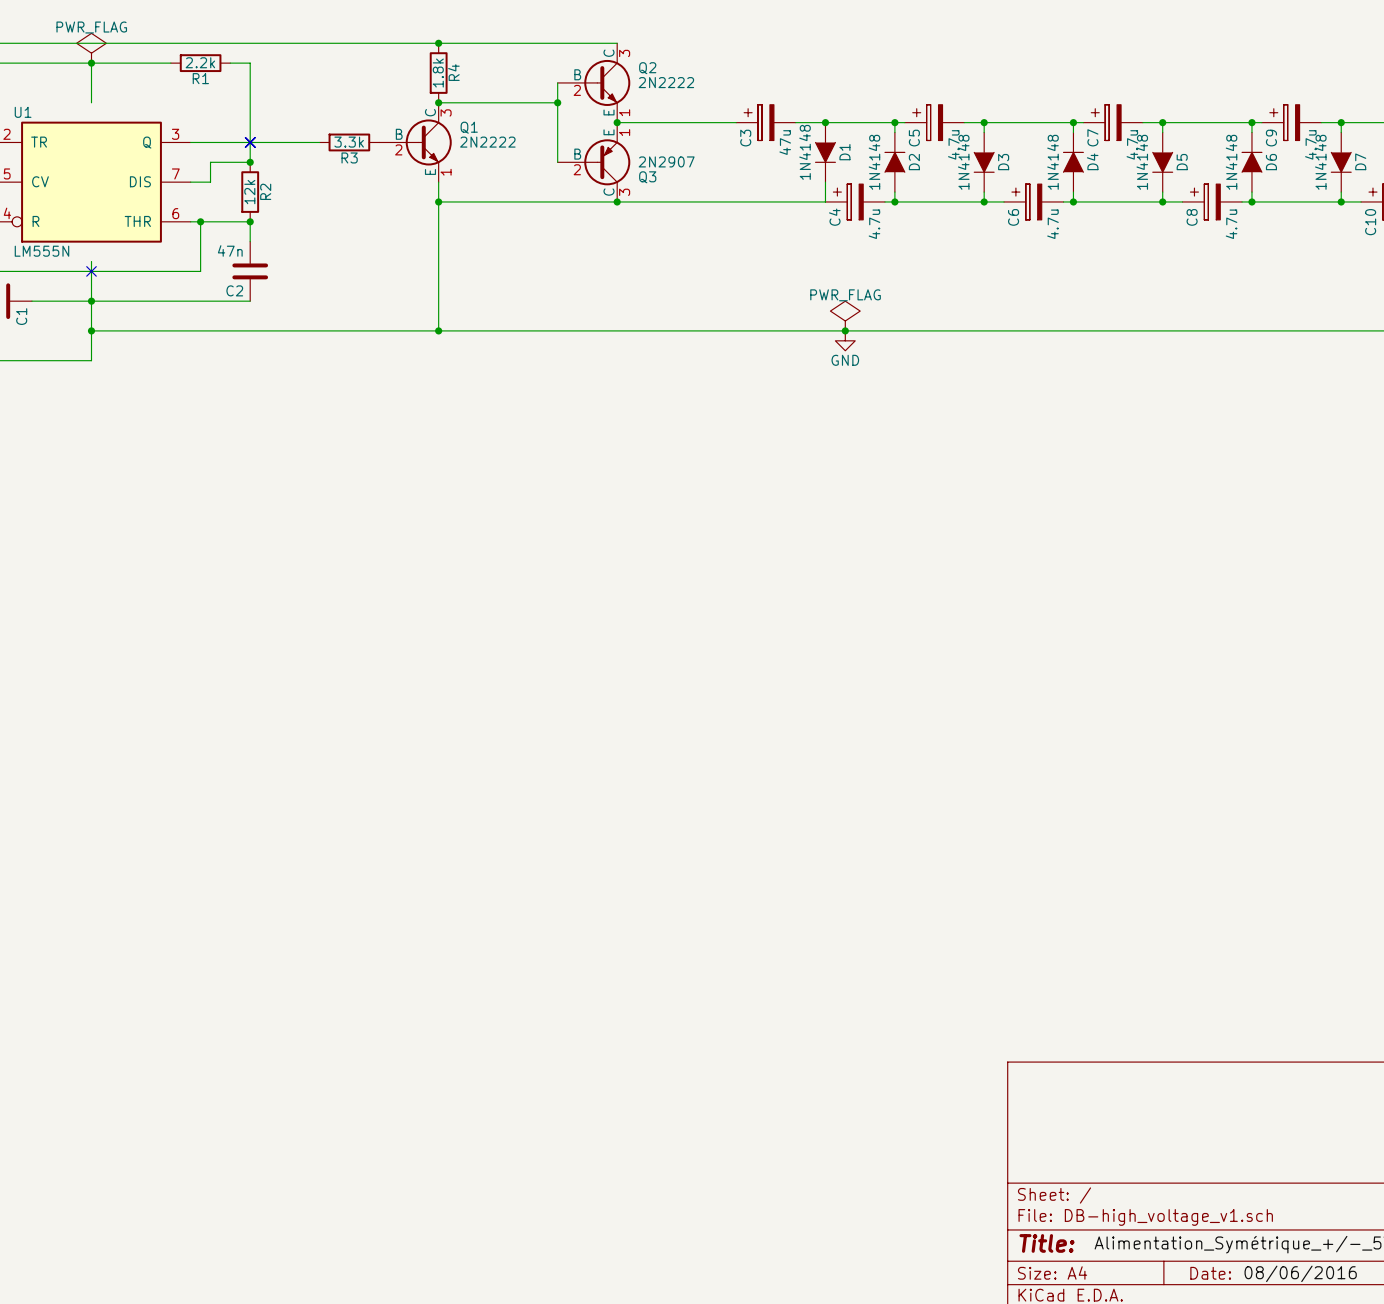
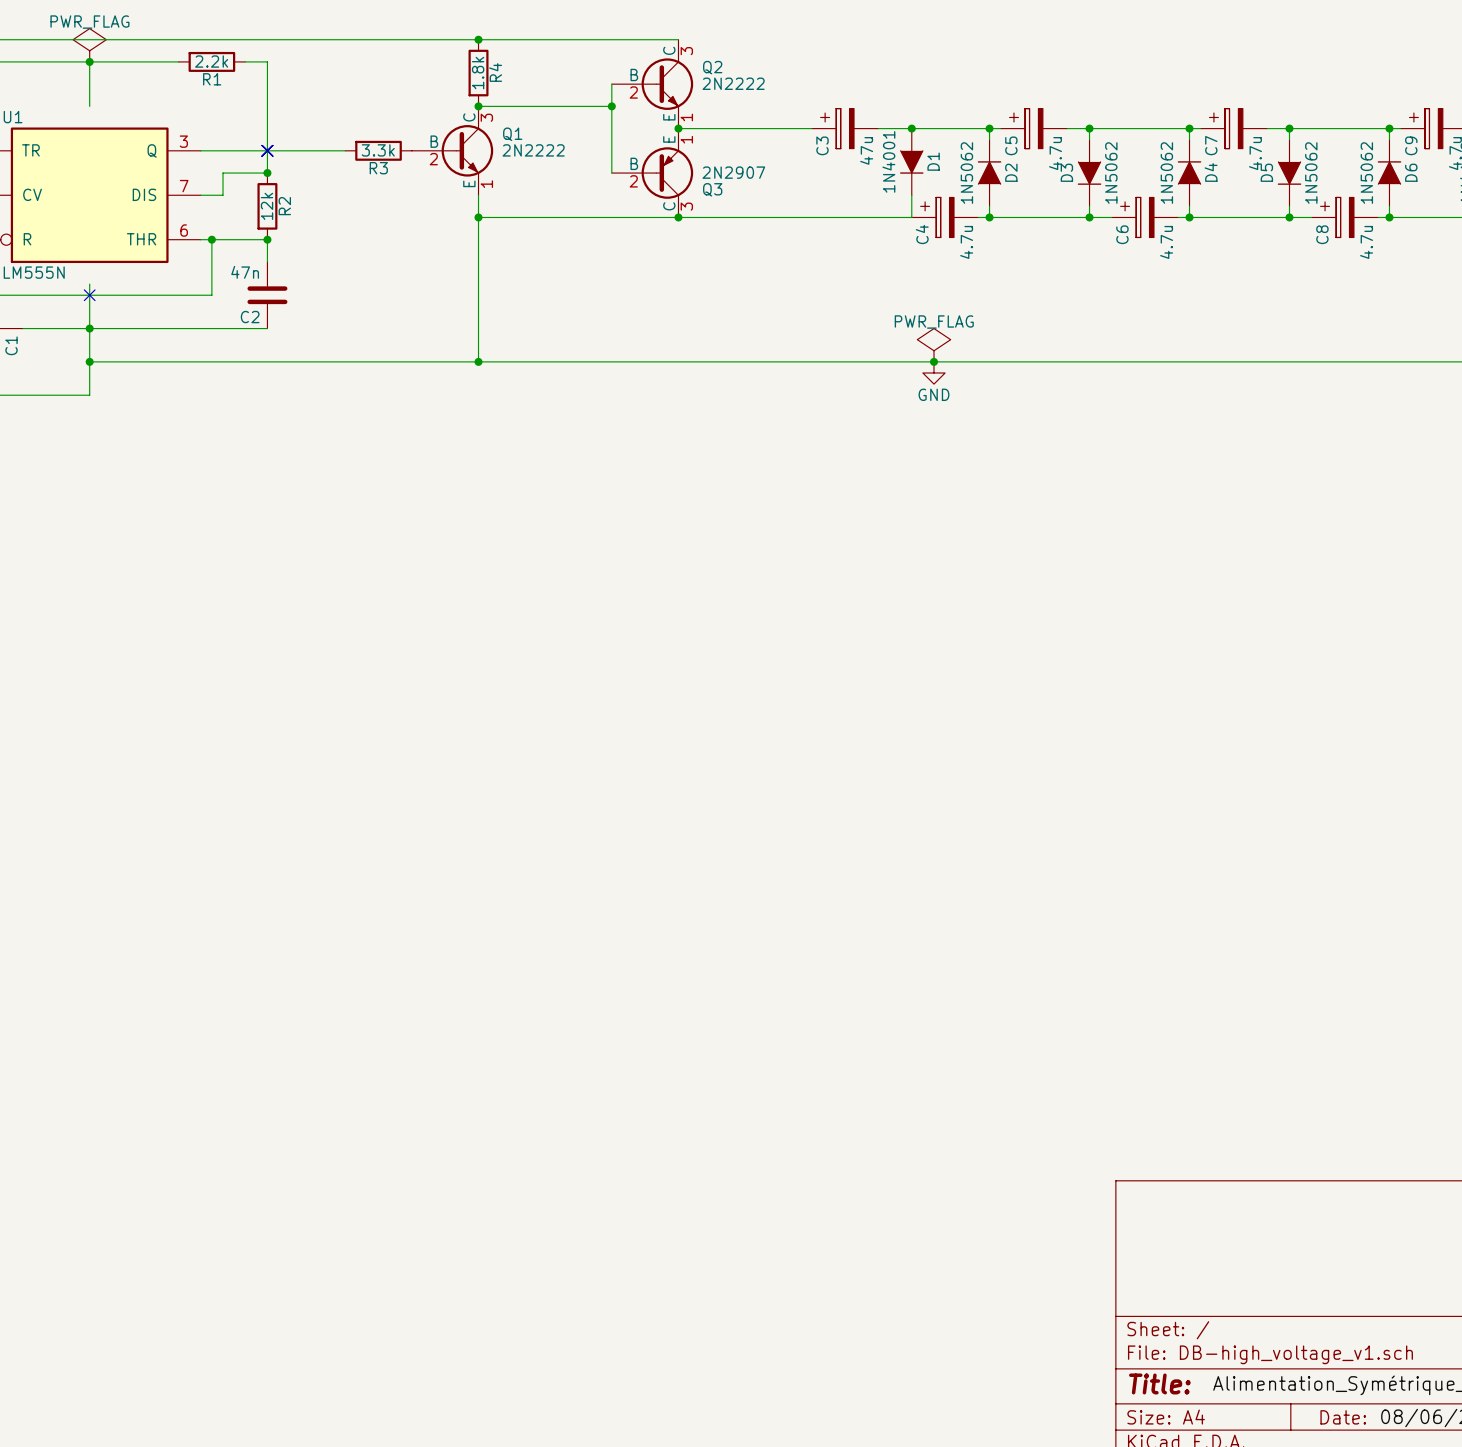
D1 value: 1N4148 (805, 152) -> 1N4001 (888, 161)
D2 value: 1N4148 (874, 162) -> 1N5062 (966, 173)
D3 value: 1N4148 (963, 162) -> 1N5062 (1111, 173)
D3 name position: D3 (1003, 162) -> D3 (1066, 172)
D4 value: 1N4148 (1053, 162) -> 1N5062 (1166, 173)
D5 value: 1N4148 (1142, 162) -> 1N5062 (1311, 173)
D5 name position: D5 (1182, 162) -> D5 (1266, 172)
D6 value: 1N4148 (1231, 162) -> 1N5062 (1366, 173)

